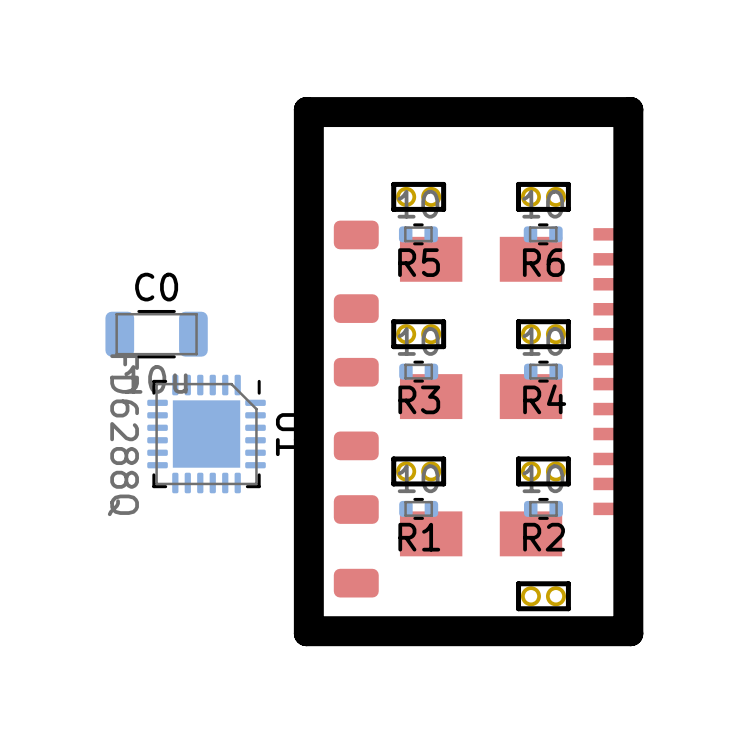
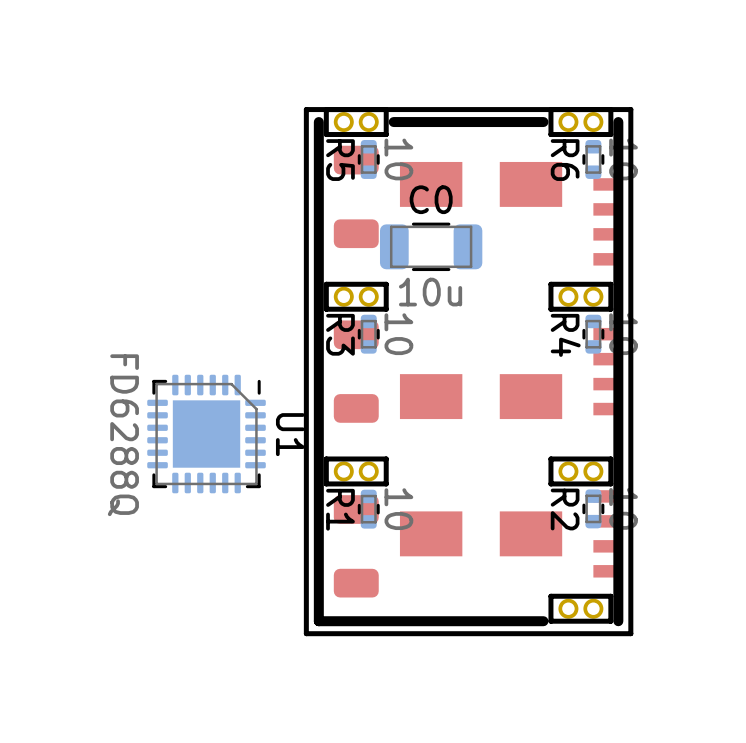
board edge width: thick (630, 109) (630, 633) (306, 633) (306, 109) (630, 109) -> thin (630, 109) (630, 633) (306, 633) (306, 109) (630, 109)
part: none -> (356, 122)
line: (393, 122) (318, 122) -> none
part: none -> (580, 122)
line: (618, 122) (543, 122) -> none
part: none -> (356, 196)
part: (418, 196) -> none
part: (543, 196) -> none
part footprint: [333, 220, 379, 323] -> [323, 281, 389, 312]
part: none -> (605, 221)
part footprint: [593, 228, 619, 516] -> [593, 327, 619, 416]
R5 rotation: 0° (418, 234) -> 90° clockwise (368, 159)
R5 position: (418, 234) -> (368, 159)
R6 rotation: 0° (543, 234) -> 90° clockwise (593, 159)
R6 position: (543, 234) -> (593, 159)
part position: (481, 259) -> (481, 184)
part: none -> (580, 296)
C0 position: (156, 334) -> (431, 246)
part: (418, 334) -> none
part: (543, 334) -> none
R3 rotation: 0° (418, 371) -> 90° clockwise (368, 334)
R3 position: (418, 371) -> (368, 334)
R4 rotation: 0° (543, 371) -> 90° clockwise (593, 334)
R4 position: (543, 371) -> (593, 334)
part position: (356, 409) -> (356, 371)
part: none -> (356, 471)
part: (418, 471) -> none
part: (543, 471) -> none
part: none -> (580, 471)
R1 rotation: 0° (418, 508) -> 90° clockwise (368, 509)
R1 position: (418, 508) -> (368, 509)
R2 rotation: 0° (543, 508) -> 90° clockwise (593, 508)
R2 position: (543, 508) -> (593, 508)
part: none -> (605, 533)
part: (543, 596) -> none
part: none -> (580, 608)
line: (618, 621) (543, 621) -> none

